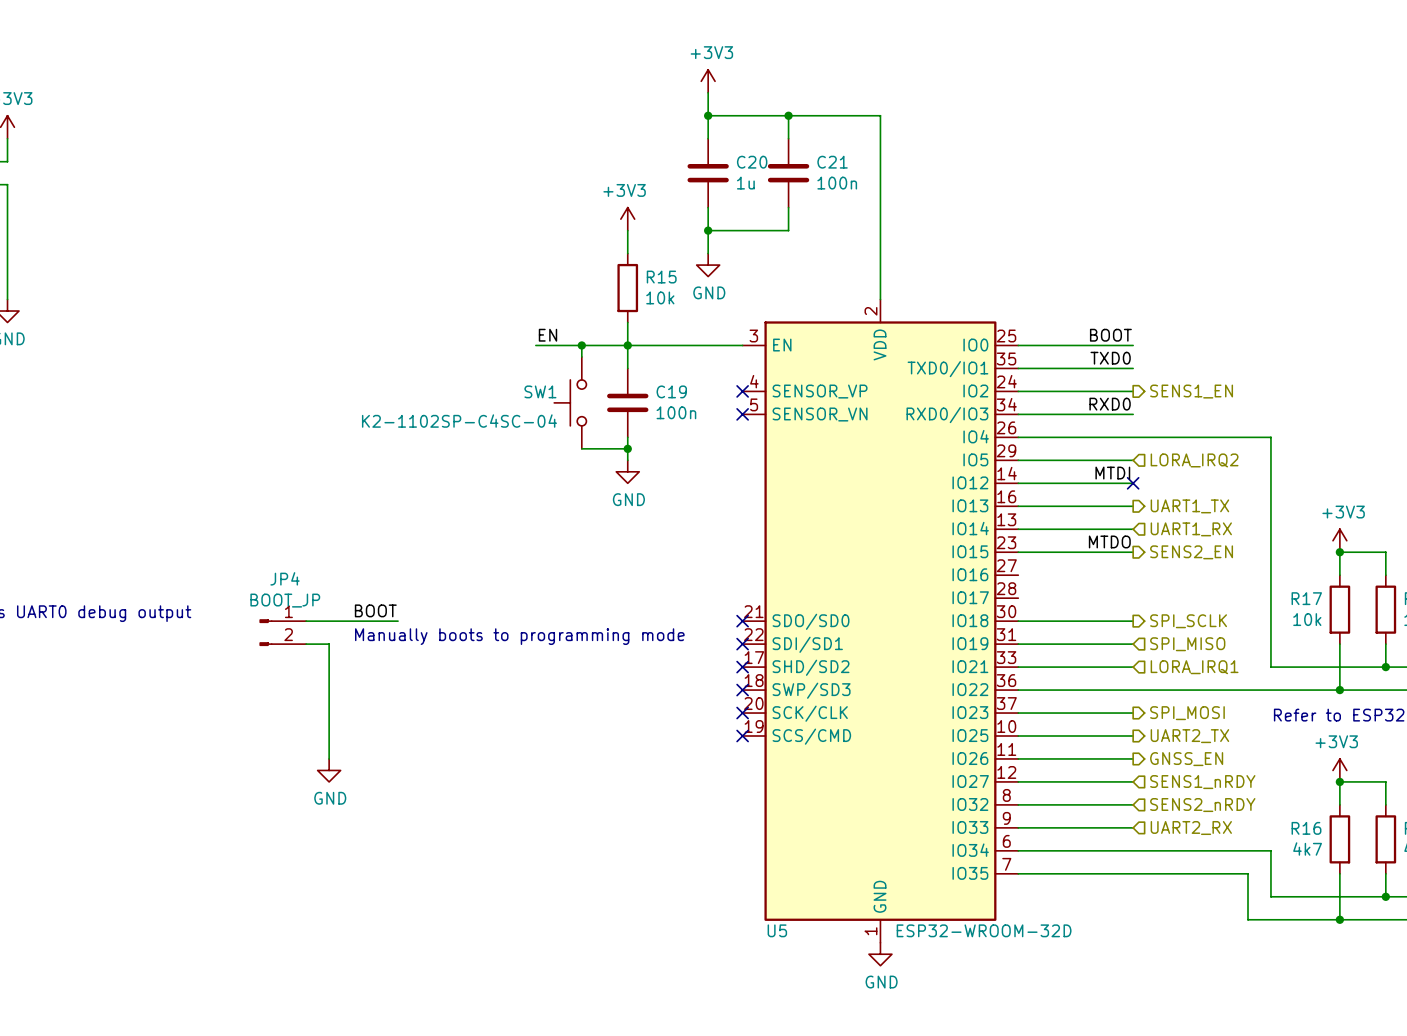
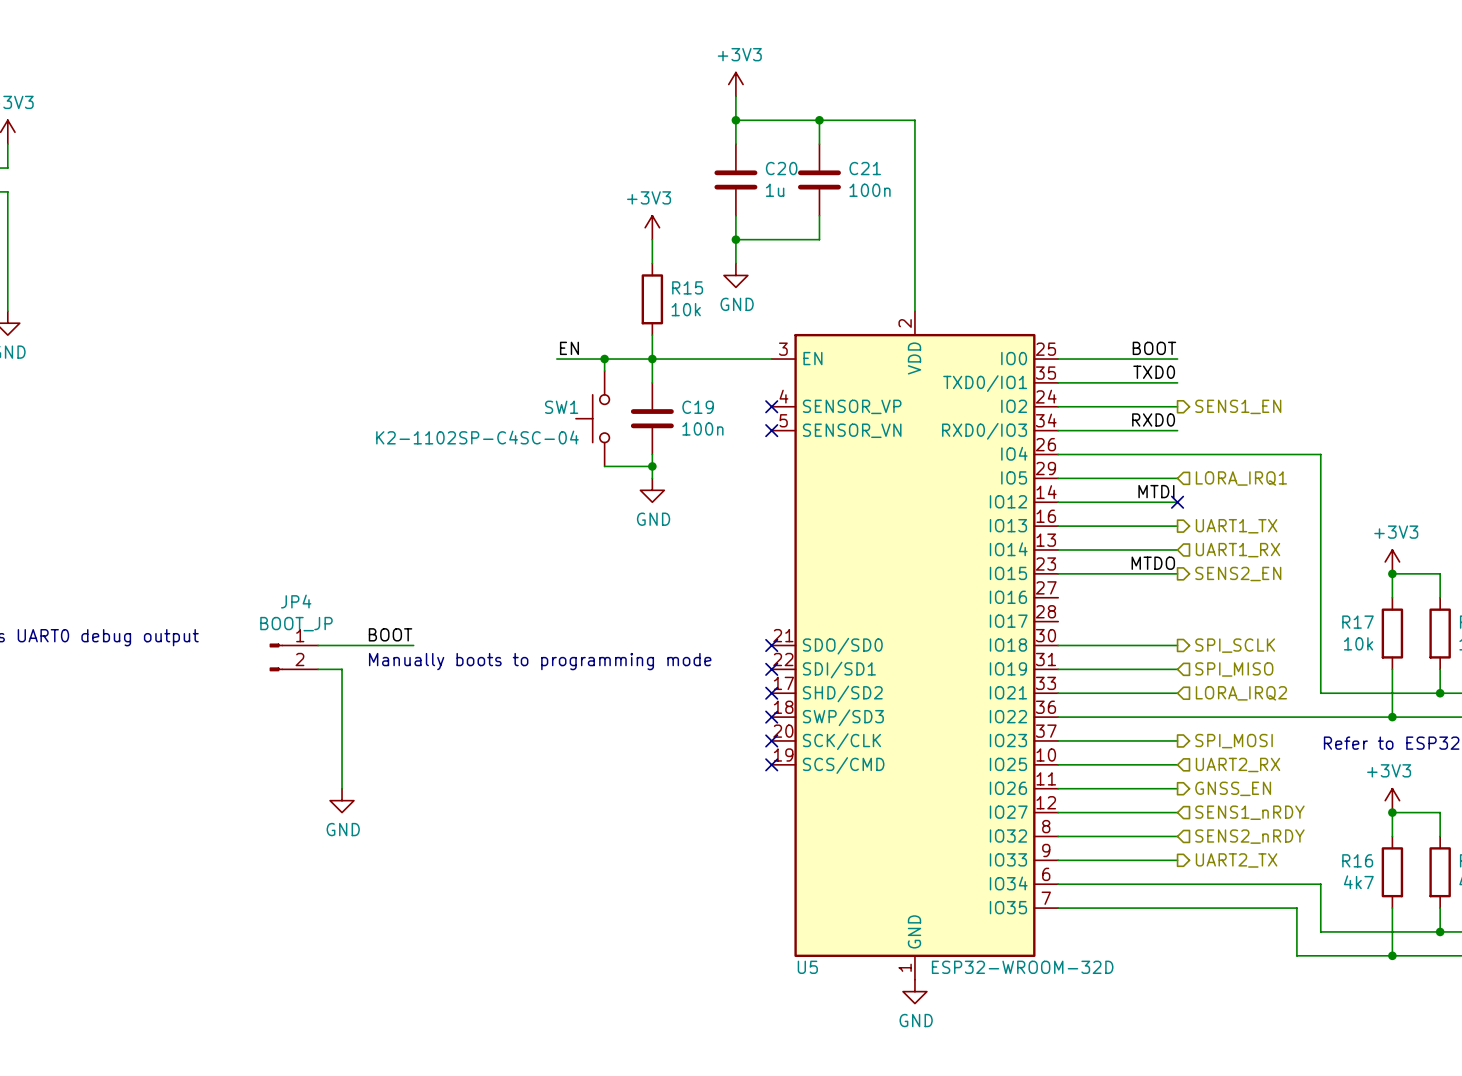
hierarchical label: LORA_IRQ2 (1194, 460) -> LORA_IRQ1 (1241, 478)
hierarchical label: LORA_IRQ1 (1194, 667) -> LORA_IRQ2 (1241, 693)
hierarchical label shape: output (1189, 736) -> input (1237, 764)
hierarchical label: UART2_TX (1189, 736) -> UART2_RX (1237, 764)
hierarchical label shape: input (1191, 828) -> output (1236, 860)
hierarchical label: UART2_RX (1191, 828) -> UART2_TX (1236, 860)

